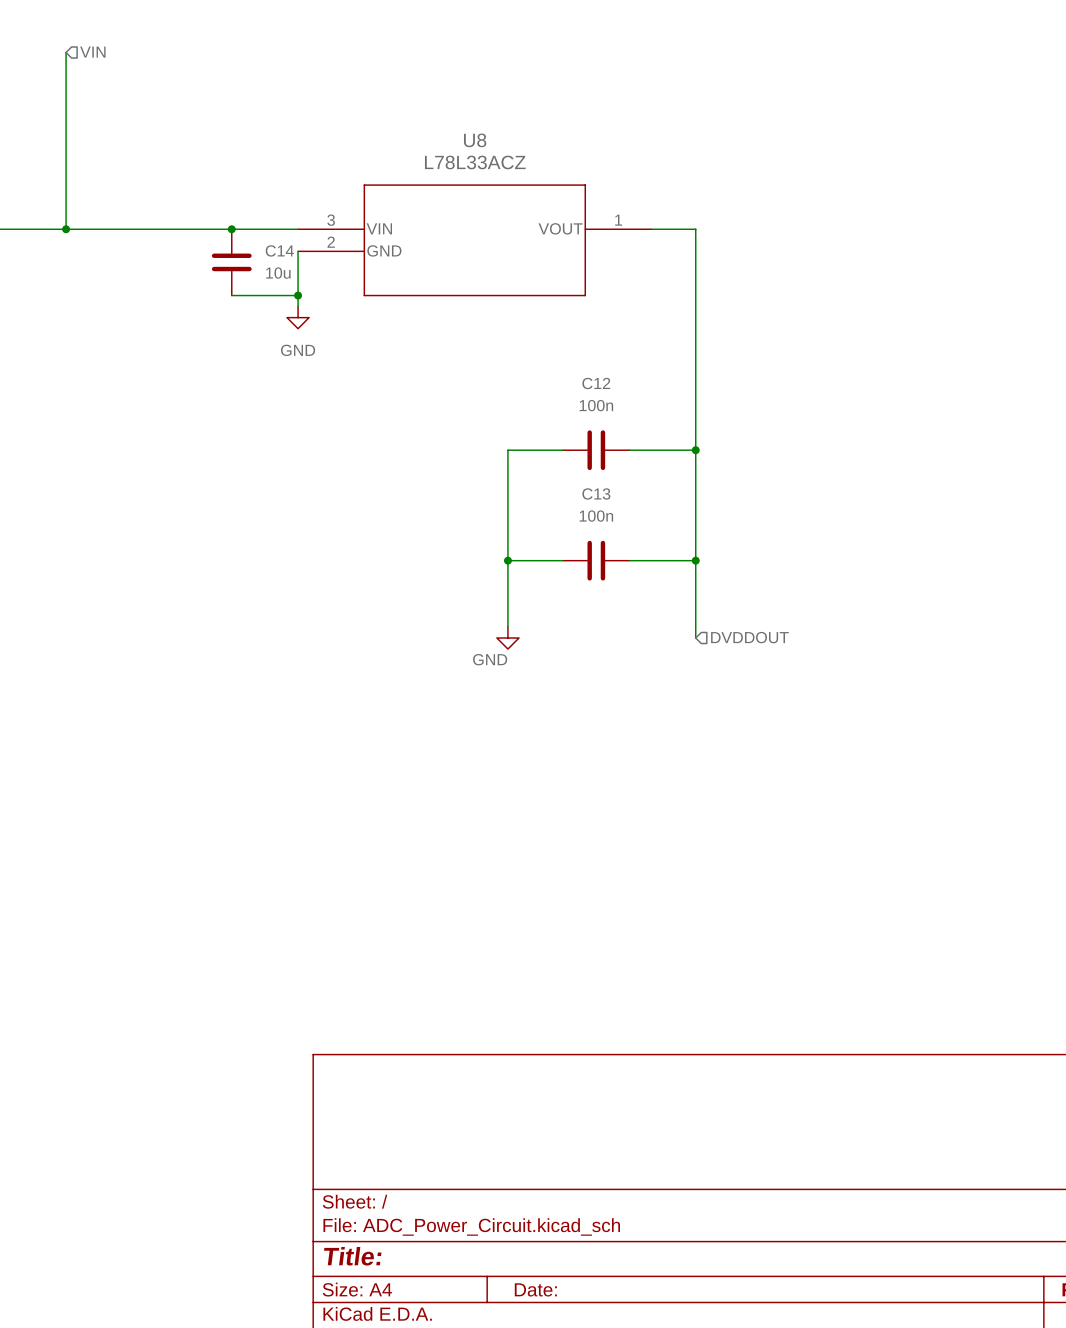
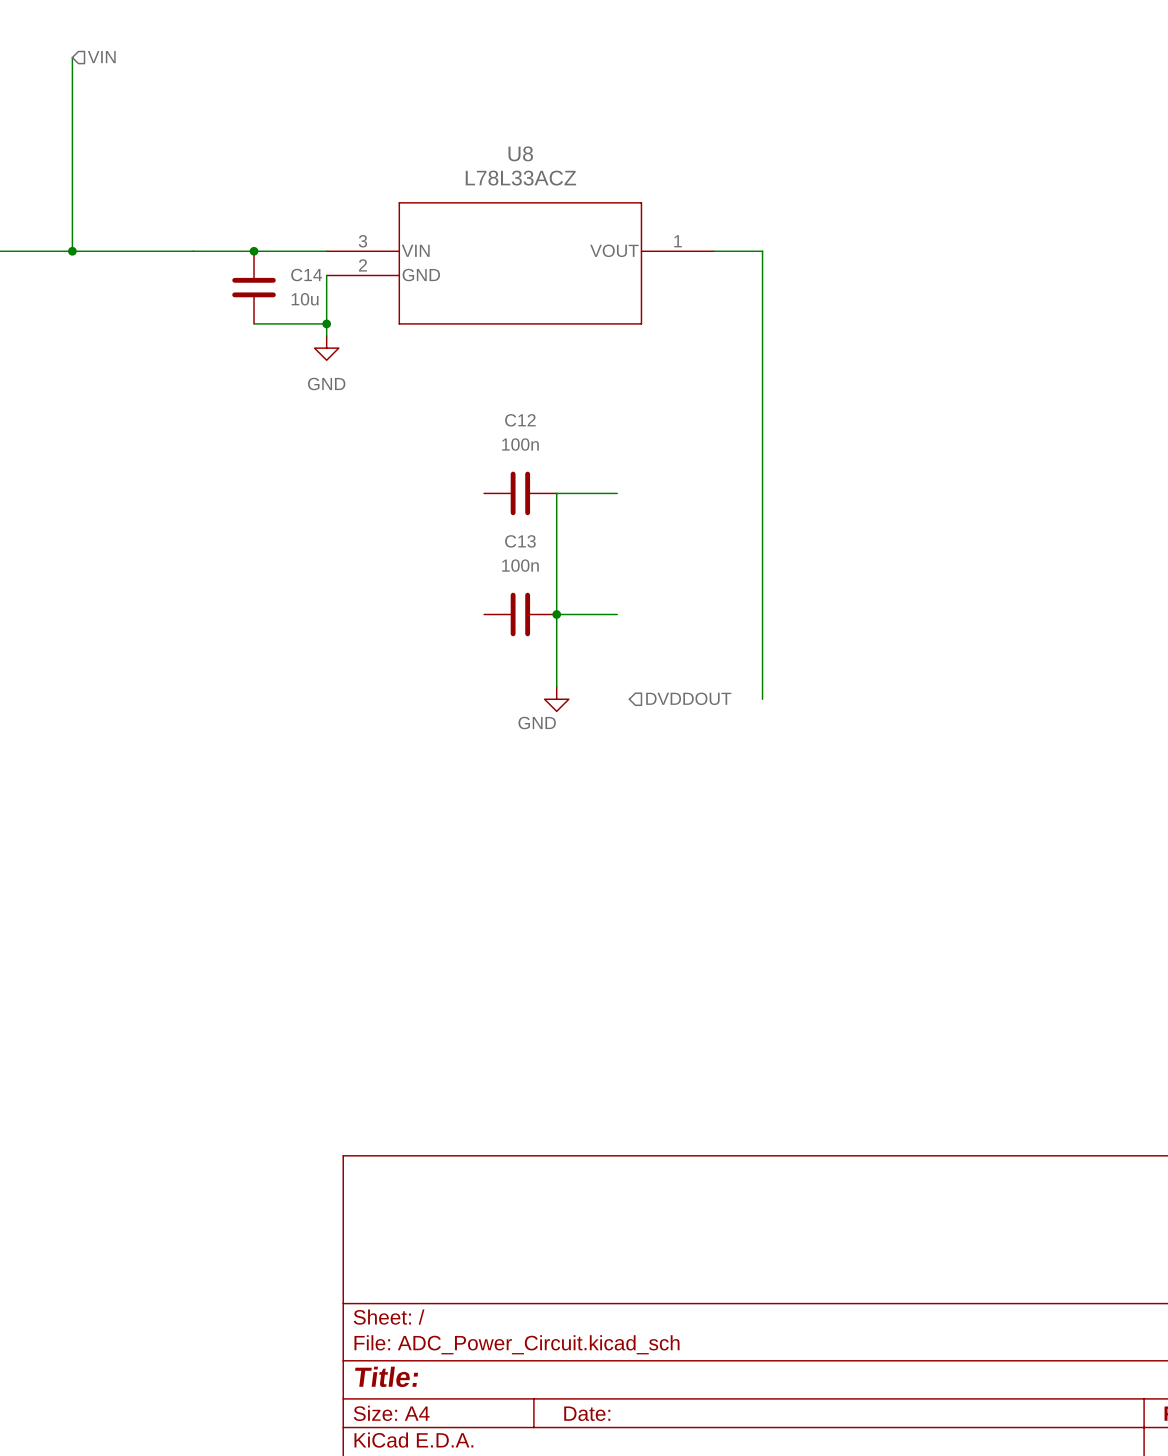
C12 position: (596, 450) -> (520, 493)
wire: (629, 450) (695, 450) -> none
junction: (695, 450) -> none
C13 position: (596, 560) -> (520, 614)
wire: (629, 560) (695, 560) -> none
junction: (695, 560) -> none
hierarchical label position: DVDDOUT (749, 637) -> DVDDOUT (688, 698)

